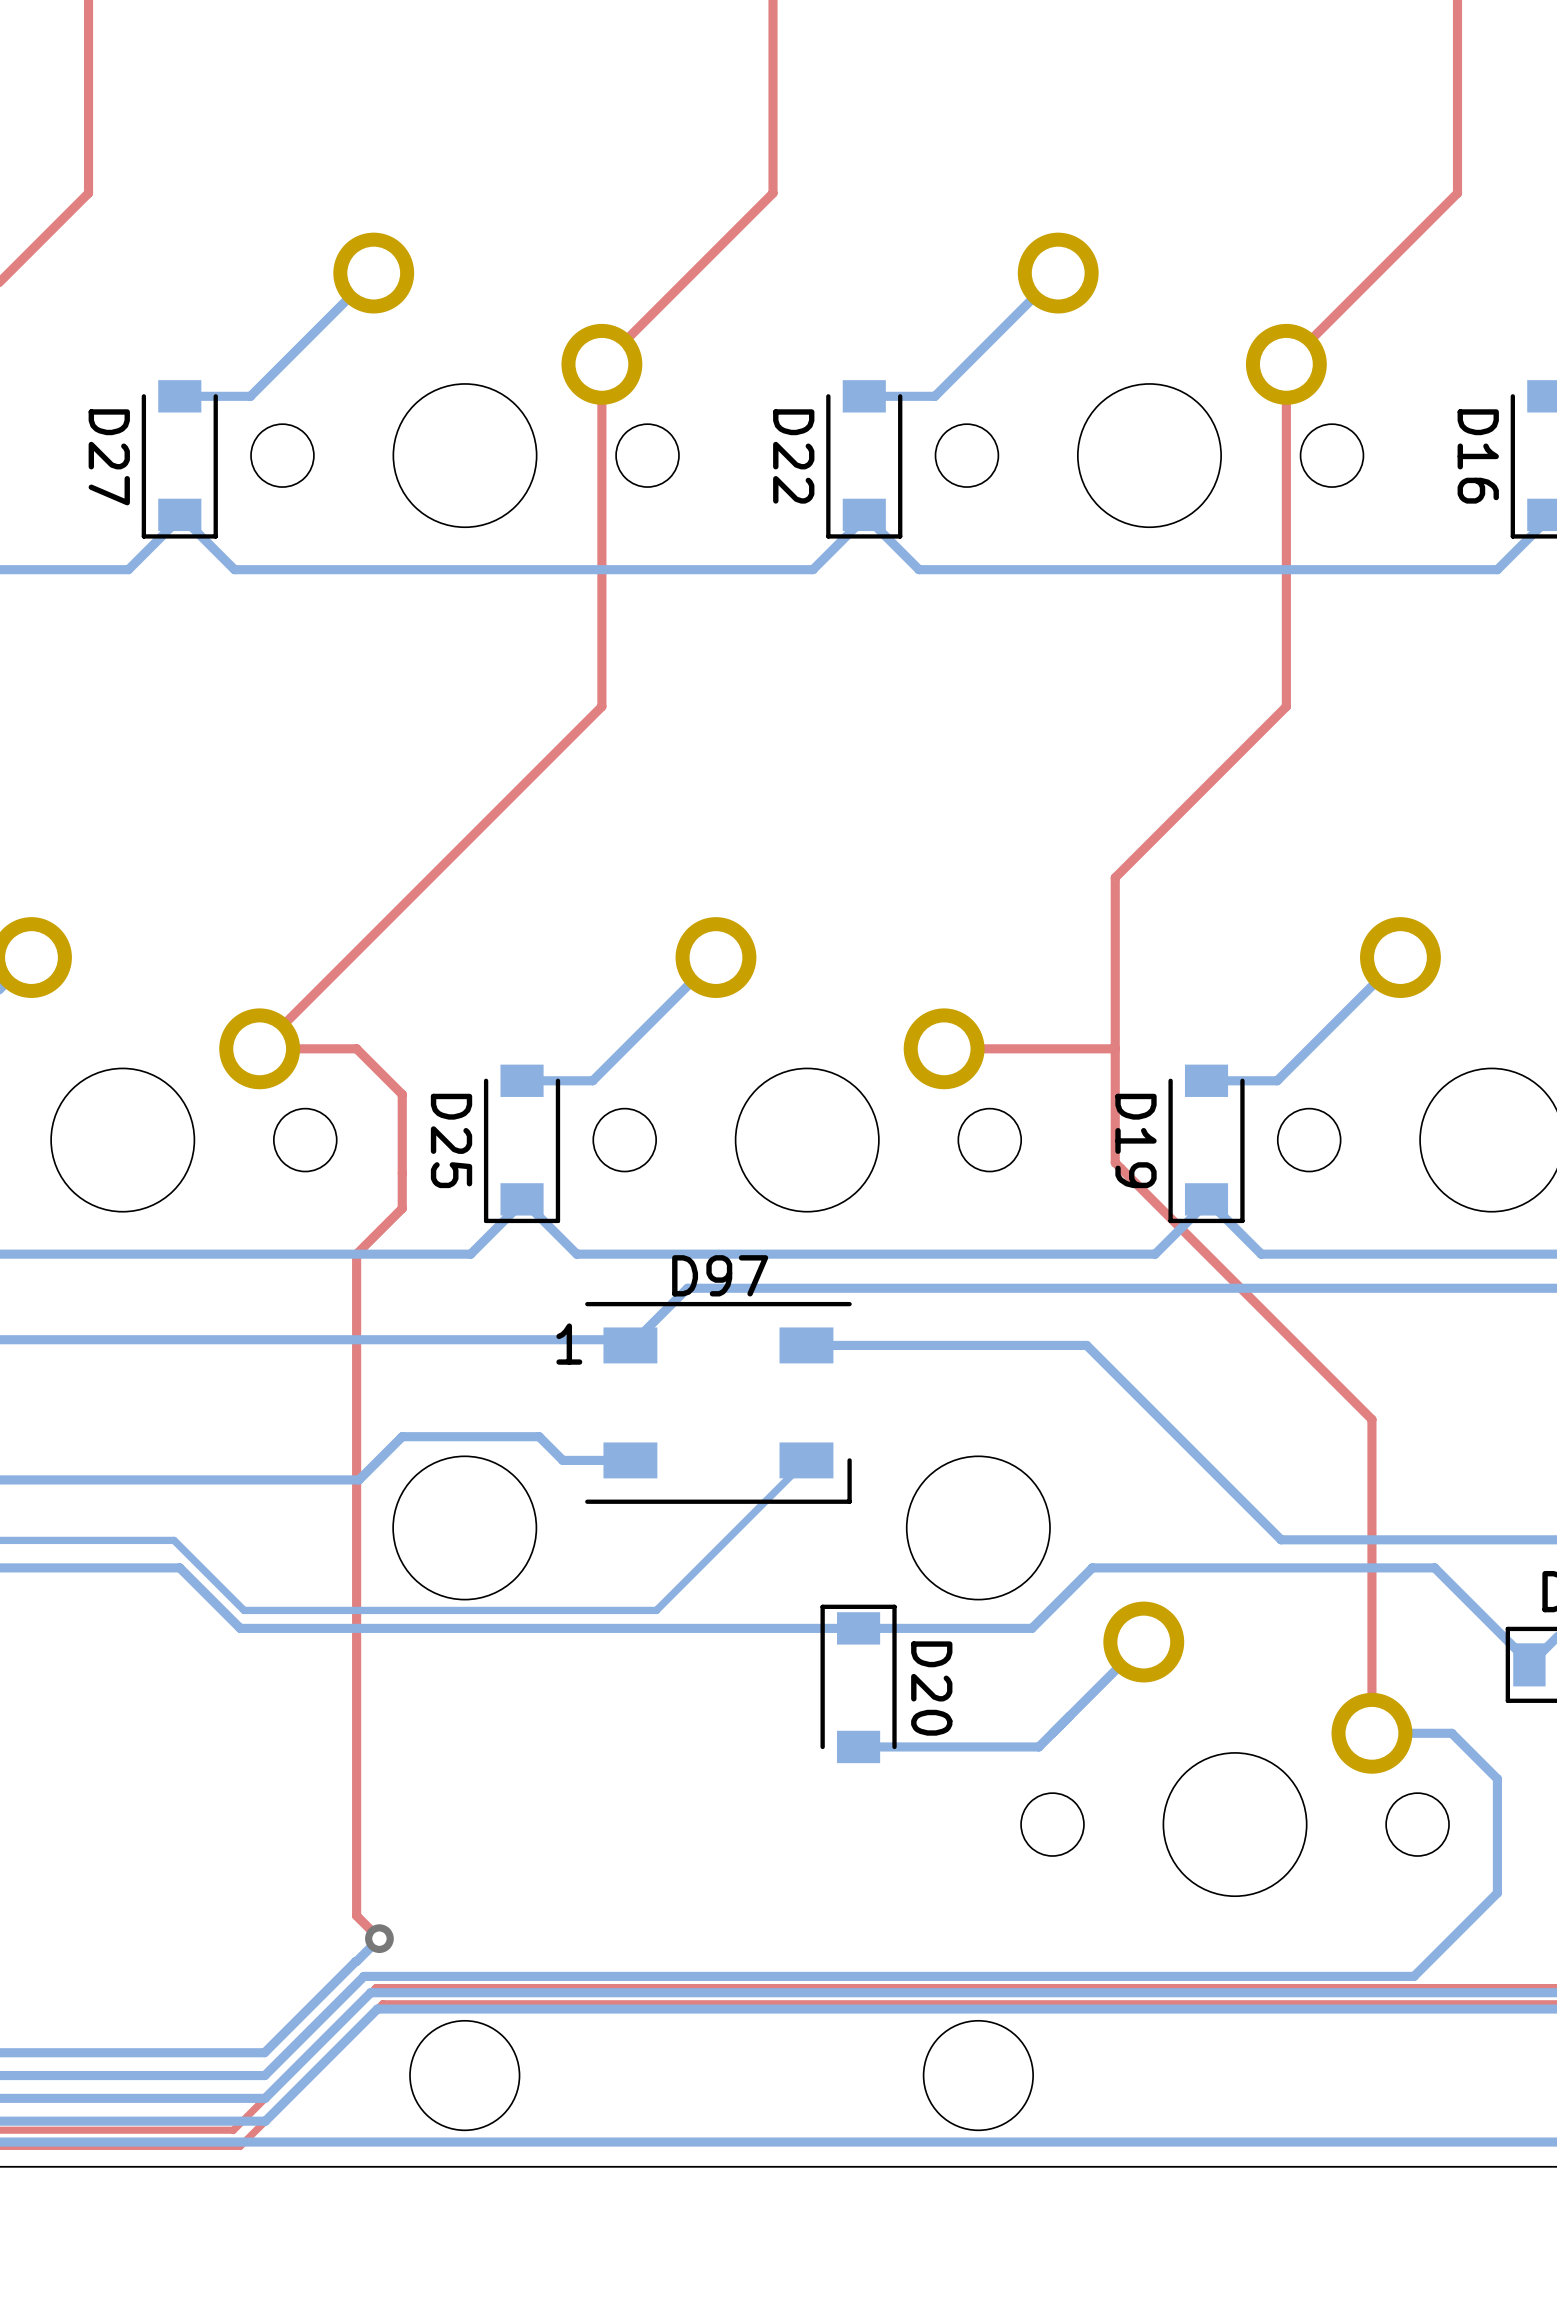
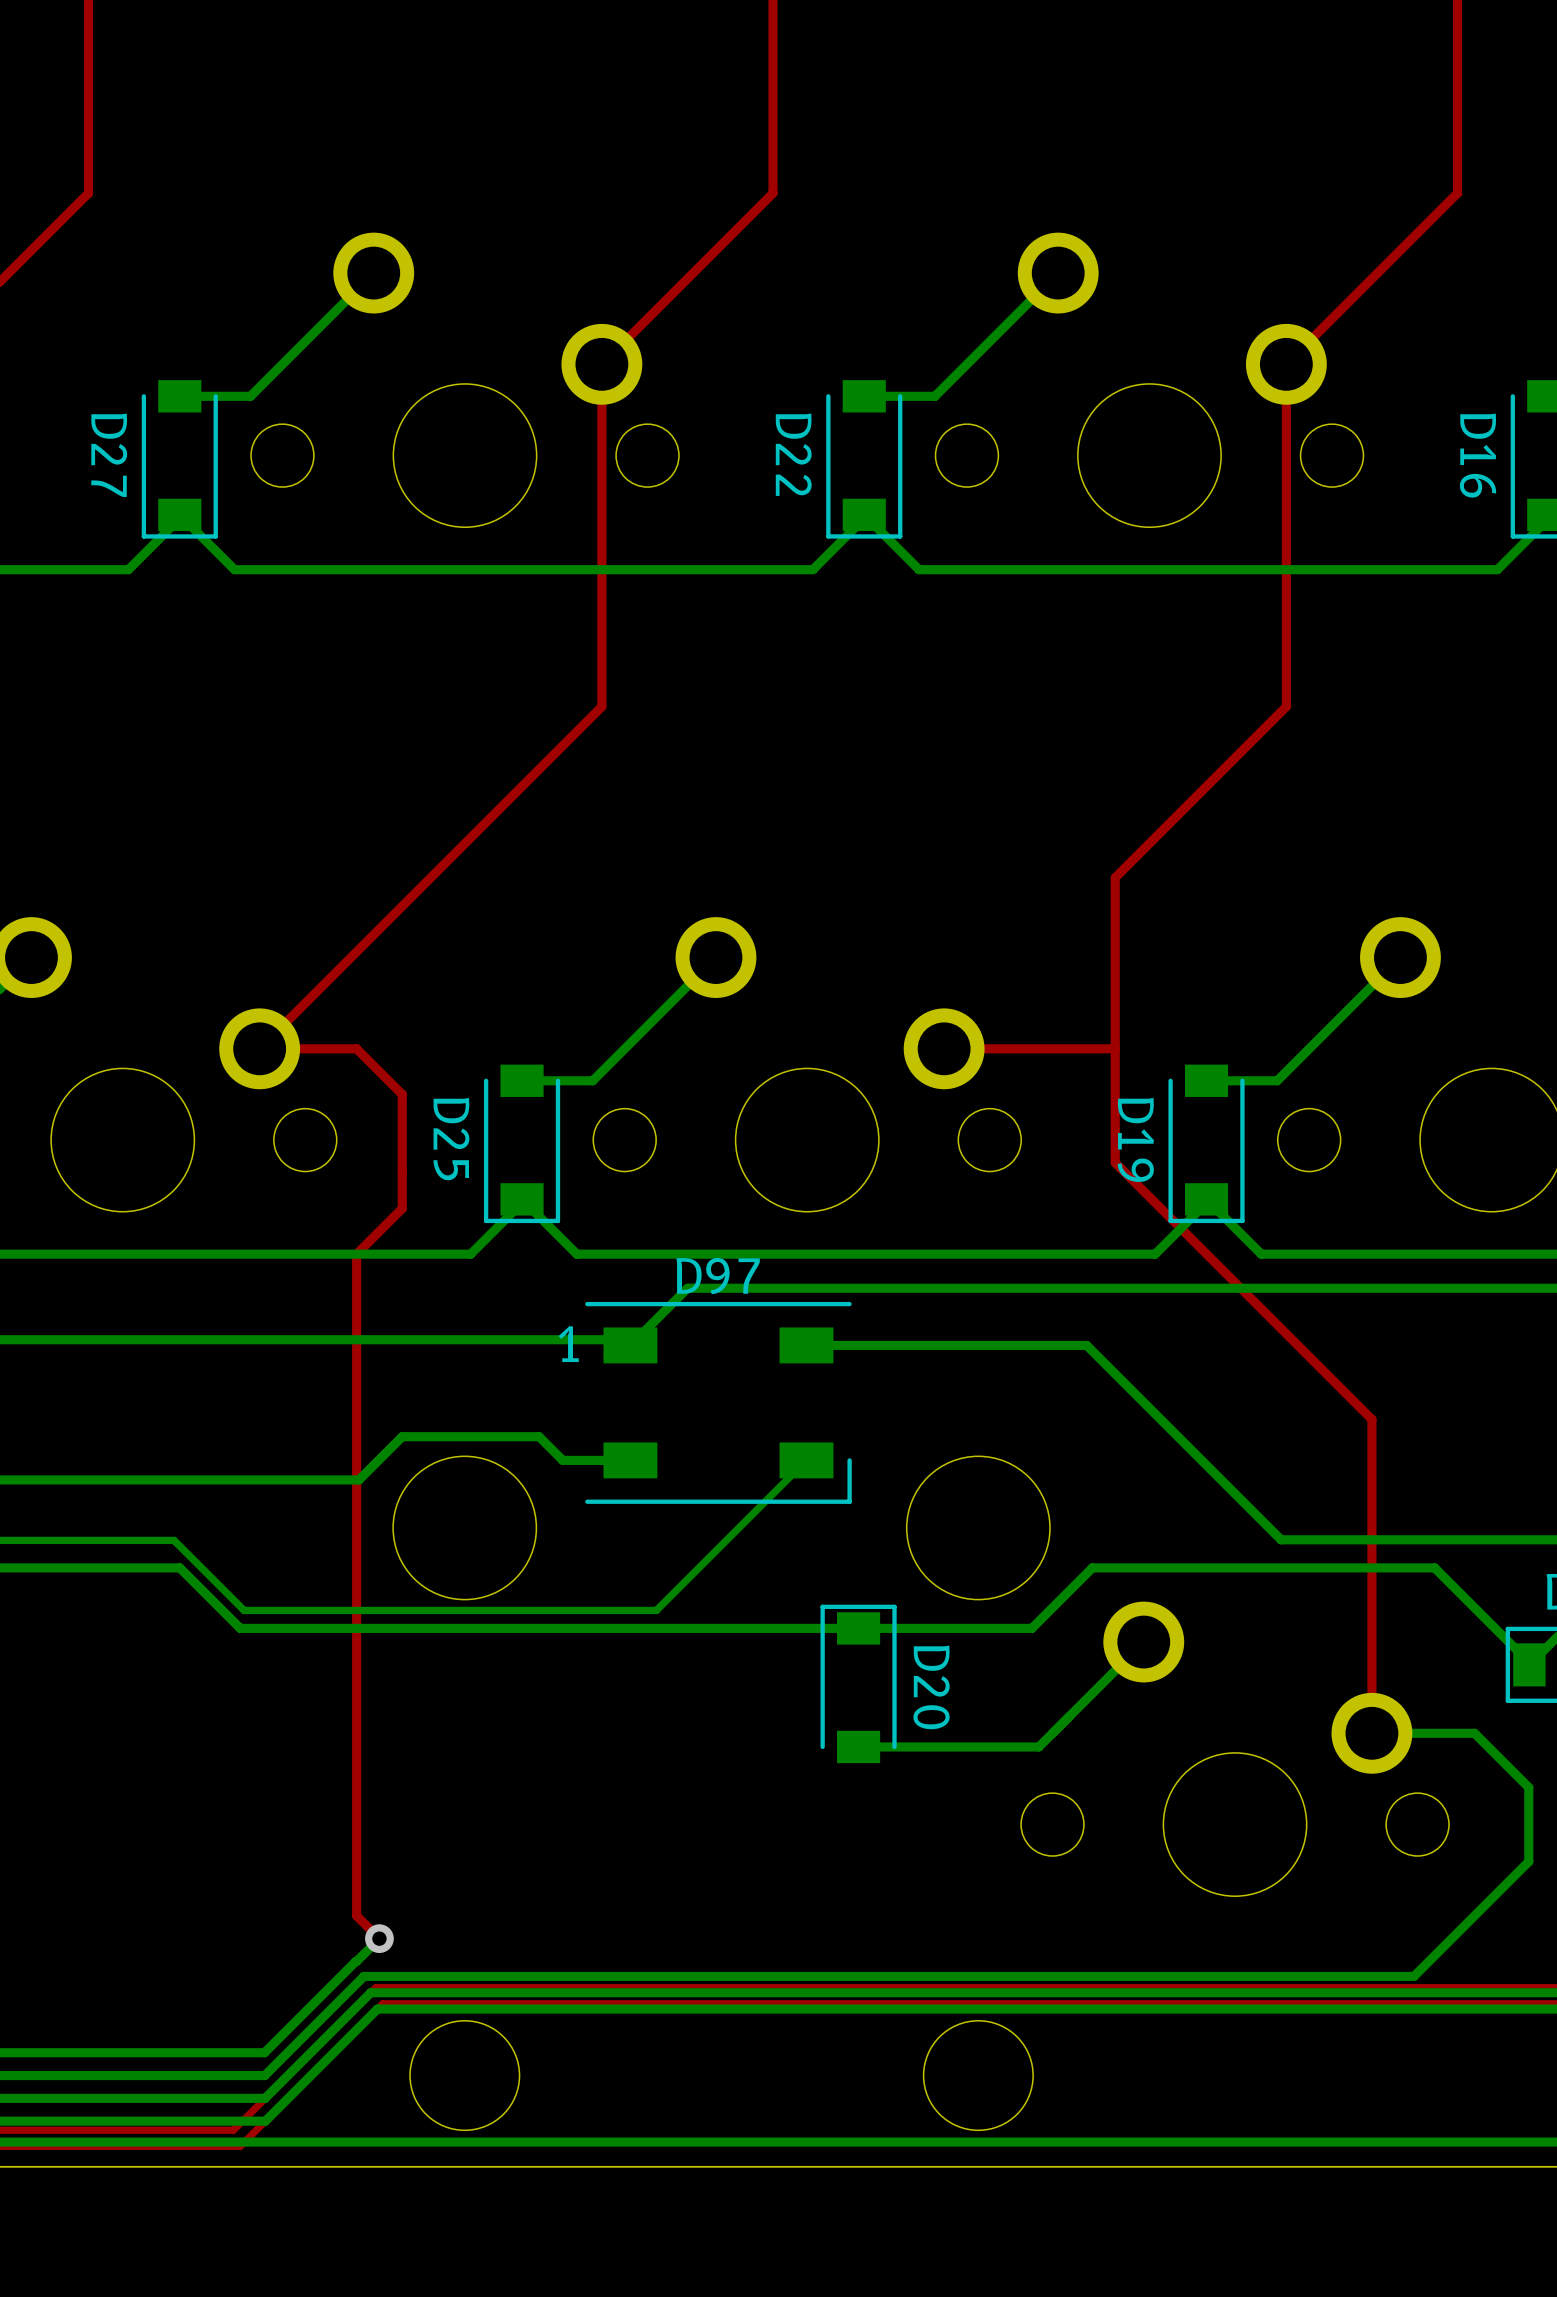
bottom track: (1451, 1733) (1497, 1778) (1497, 1893) -> (1451, 1733) (1474, 1733) (1528, 1787) (1528, 1861) (1497, 1893)

